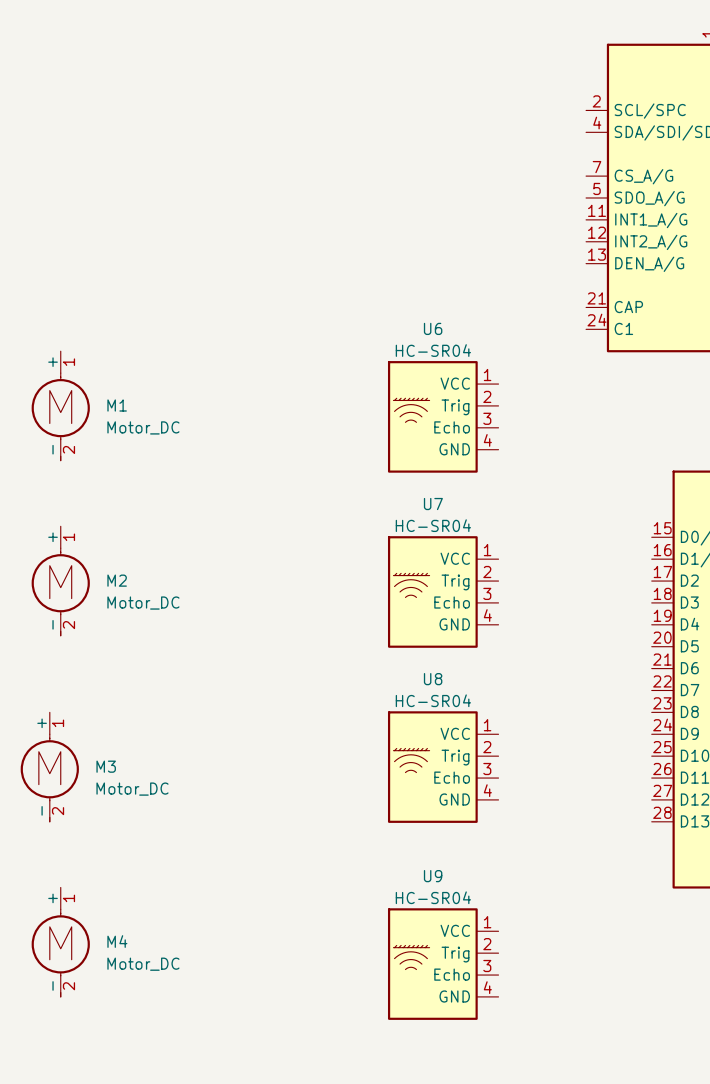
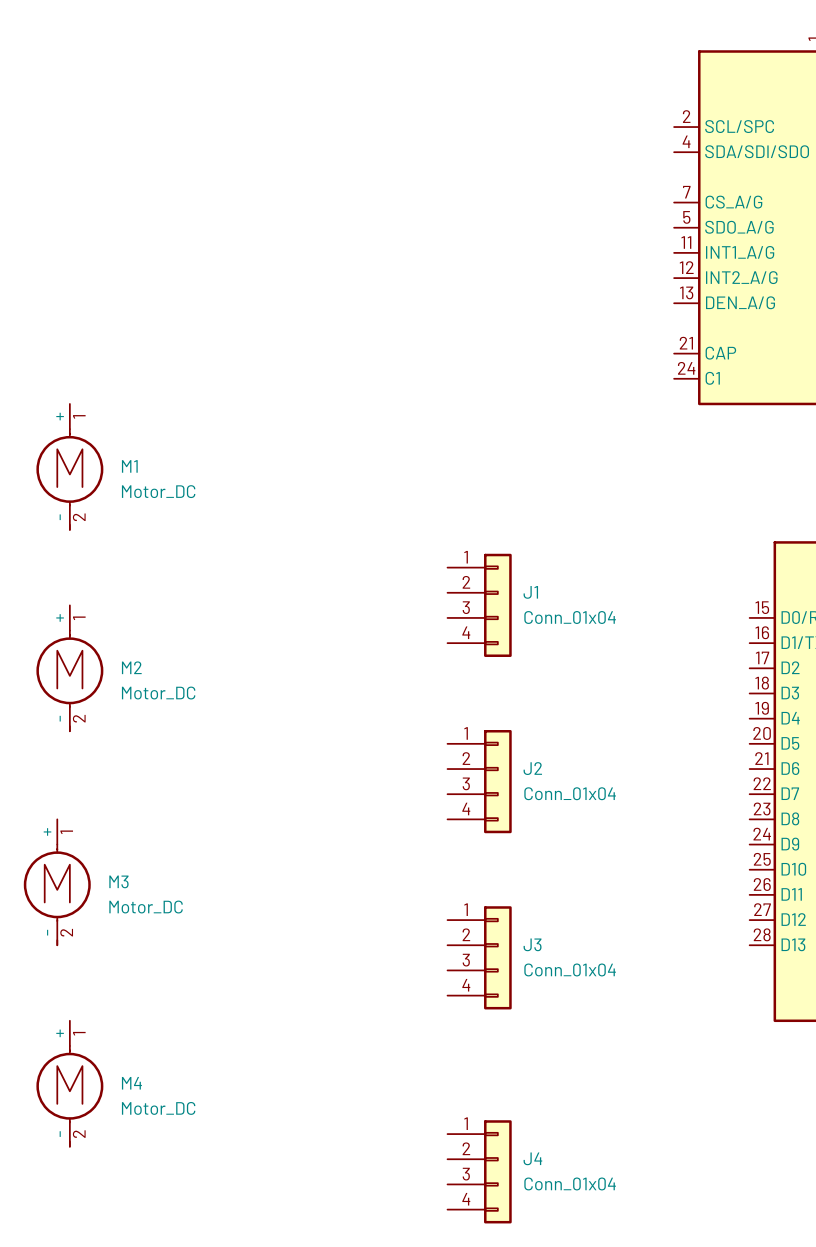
U6: HC-SR04 (443, 416) -> none
J1: none -> Conn_01x04 (479, 605)
U7: HC-SR04 (443, 591) -> none
J2: none -> Conn_01x04 (479, 781)
U8: HC-SR04 (443, 767) -> none
J3: none -> Conn_01x04 (479, 957)
U9: HC-SR04 (443, 964) -> none
J4: none -> Conn_01x04 (479, 1171)

